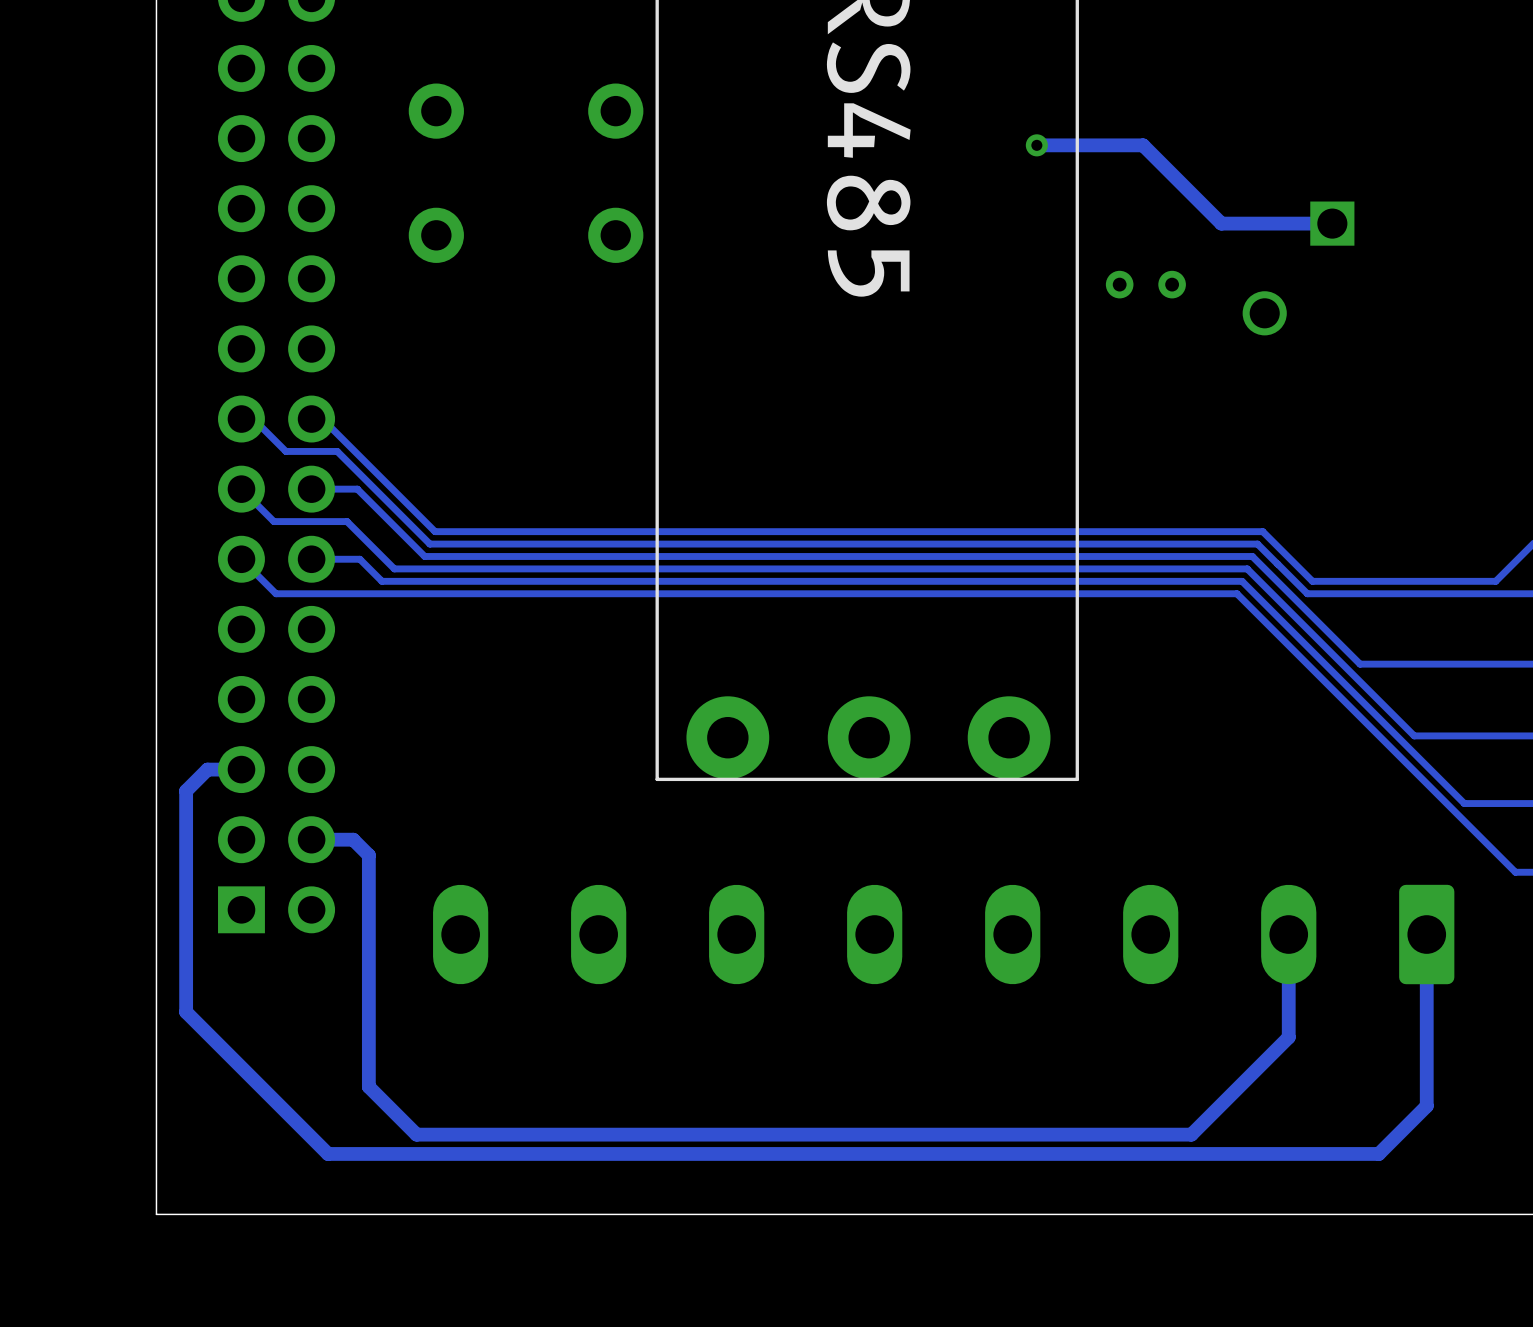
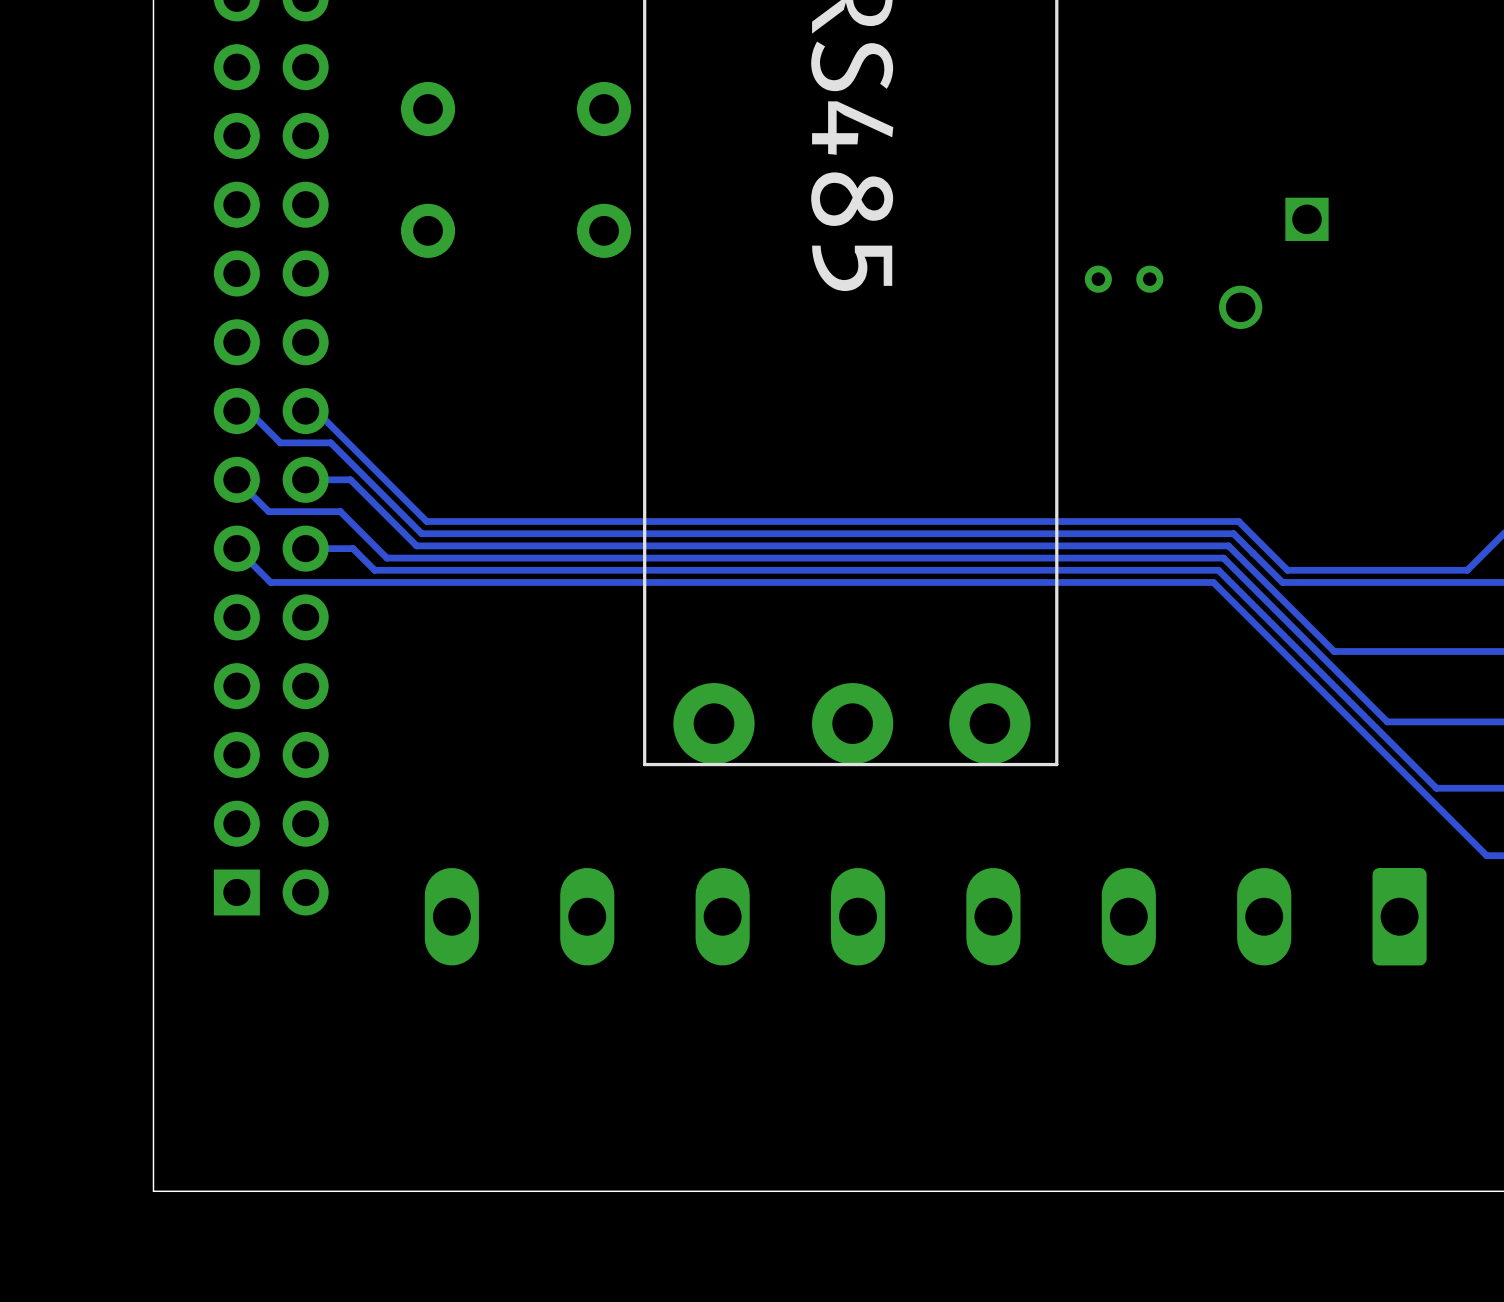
track: (1036, 145) (1143, 145) (1221, 223) (1332, 223) -> none
via: (1036, 145) -> none
track: (241, 769) (207, 769) (186, 790) (186, 1012) (328, 1153) (1378, 1153) (1426, 1106) (1426, 934) -> none
track: (311, 839) (353, 839) (368, 855) (368, 1086) (416, 1134) (1191, 1134) (1288, 1037) (1288, 934) -> none

